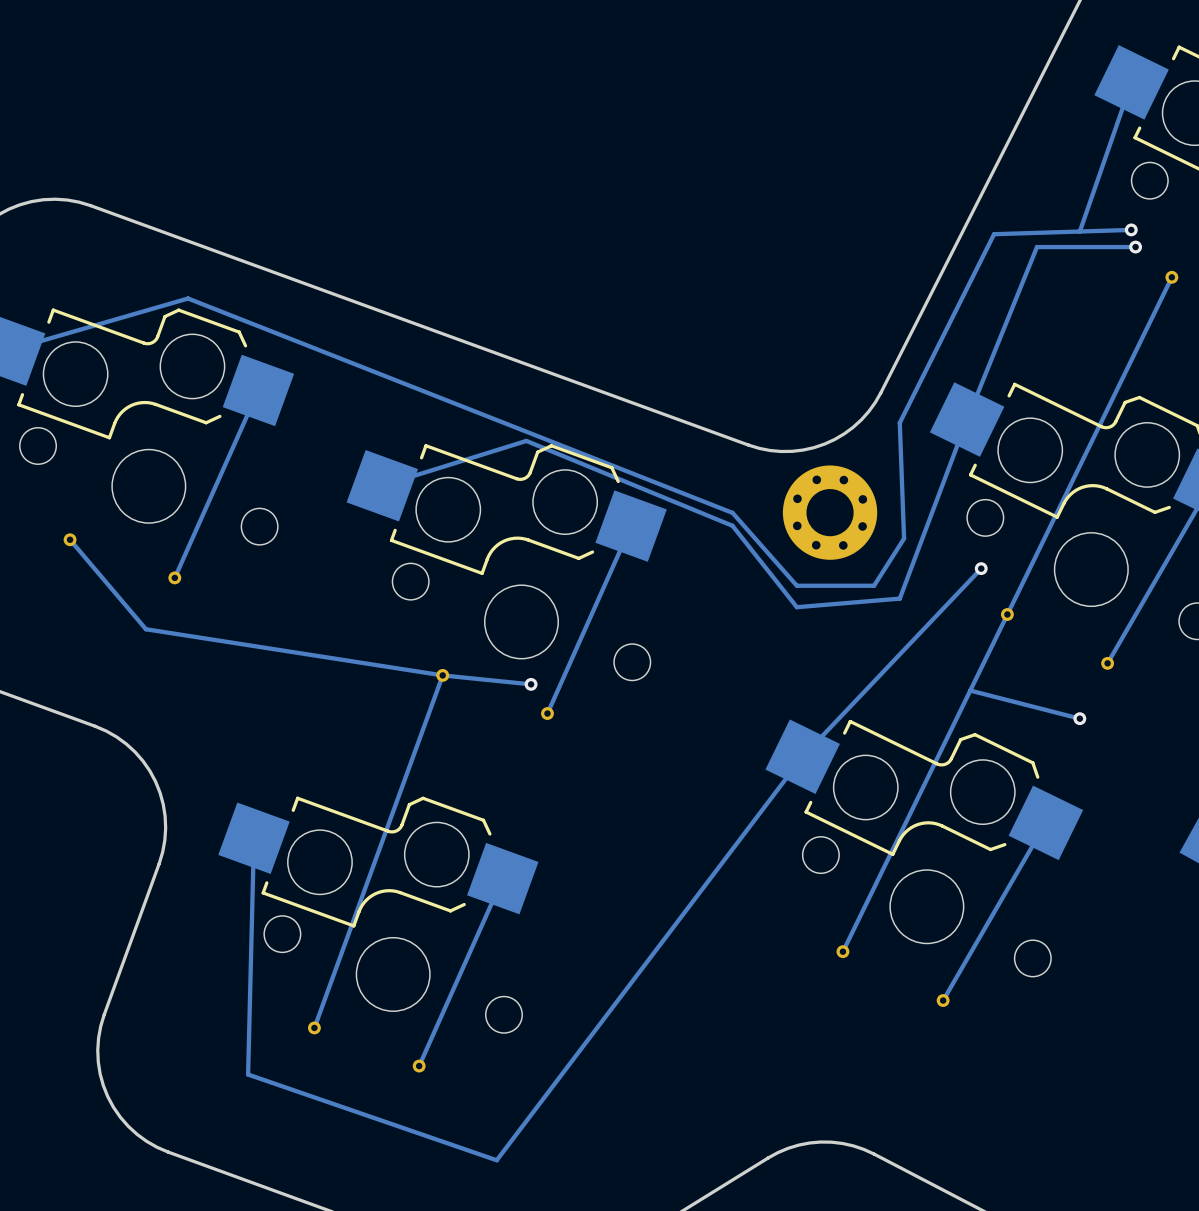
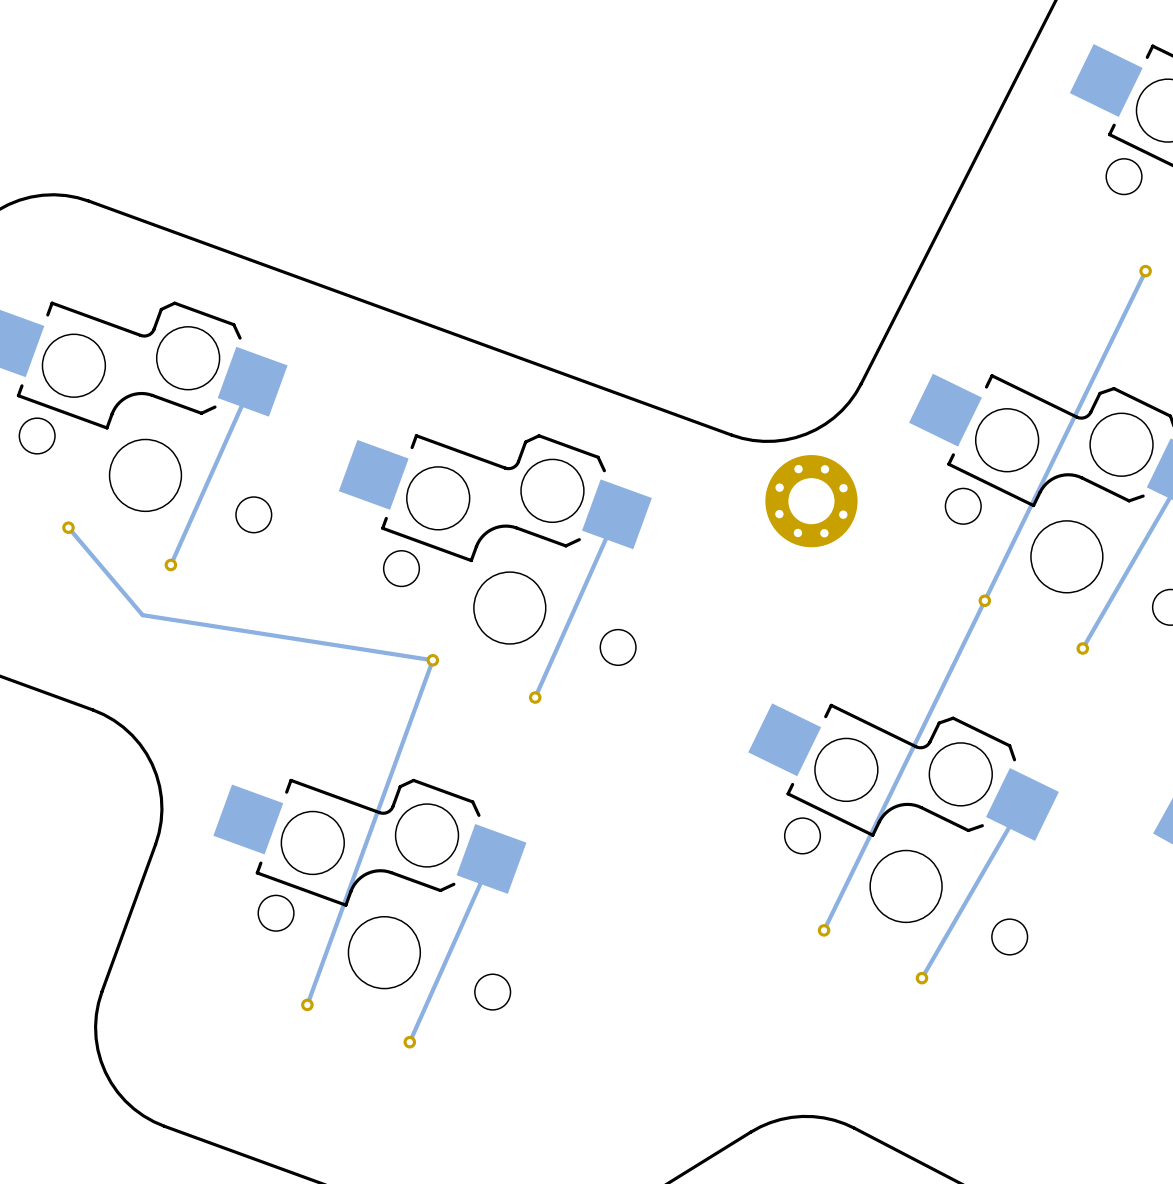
track: (1131, 82) (1079, 231) -> none
track: (1131, 229) (994, 234) (899, 422) (904, 538) (874, 585) (796, 585) (732, 512) (188, 298) (9, 350) -> none
via: (1131, 229) -> none
track: (1135, 247) (1036, 247) (967, 419) (899, 598) (796, 607) (732, 525) (526, 440) (382, 485) -> none
via: (1135, 247) -> none
track: (981, 568) (802, 756) (496, 1160) (248, 1074) (253, 838) -> none
via: (981, 568) -> none
track: (442, 675) (531, 684) -> none
via: (531, 684) -> none
track: (970, 690) (1079, 718) -> none
via: (1079, 718) -> none

